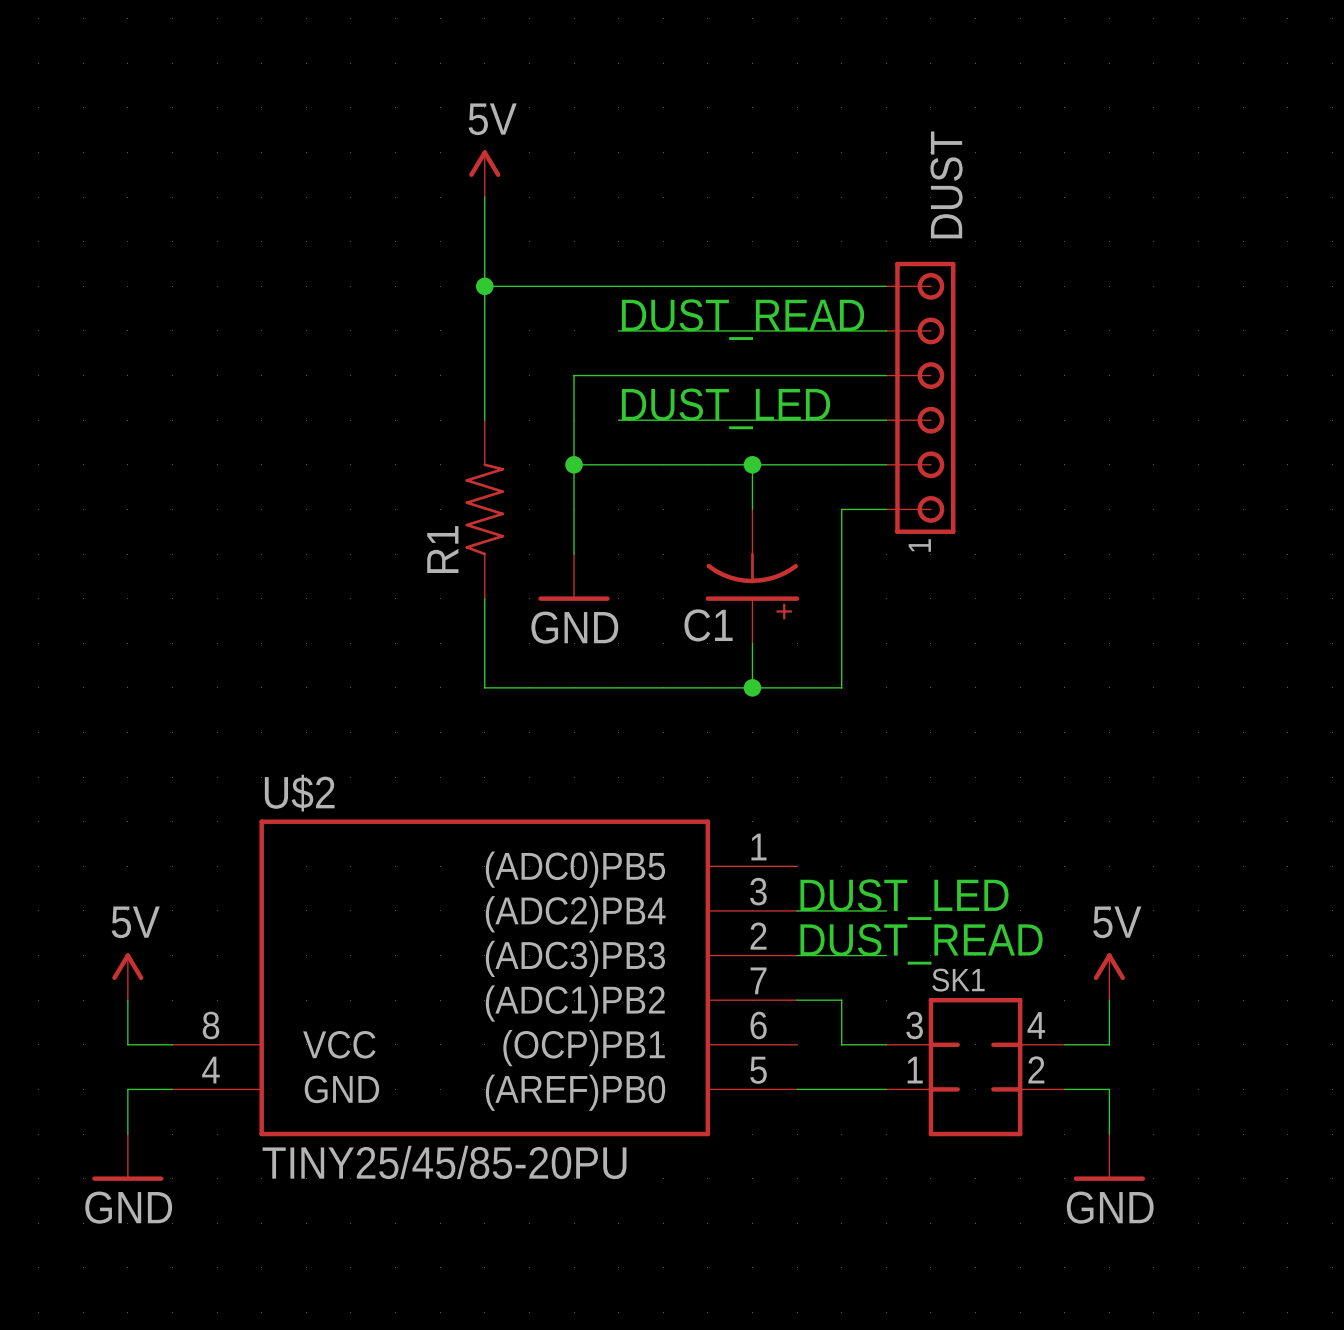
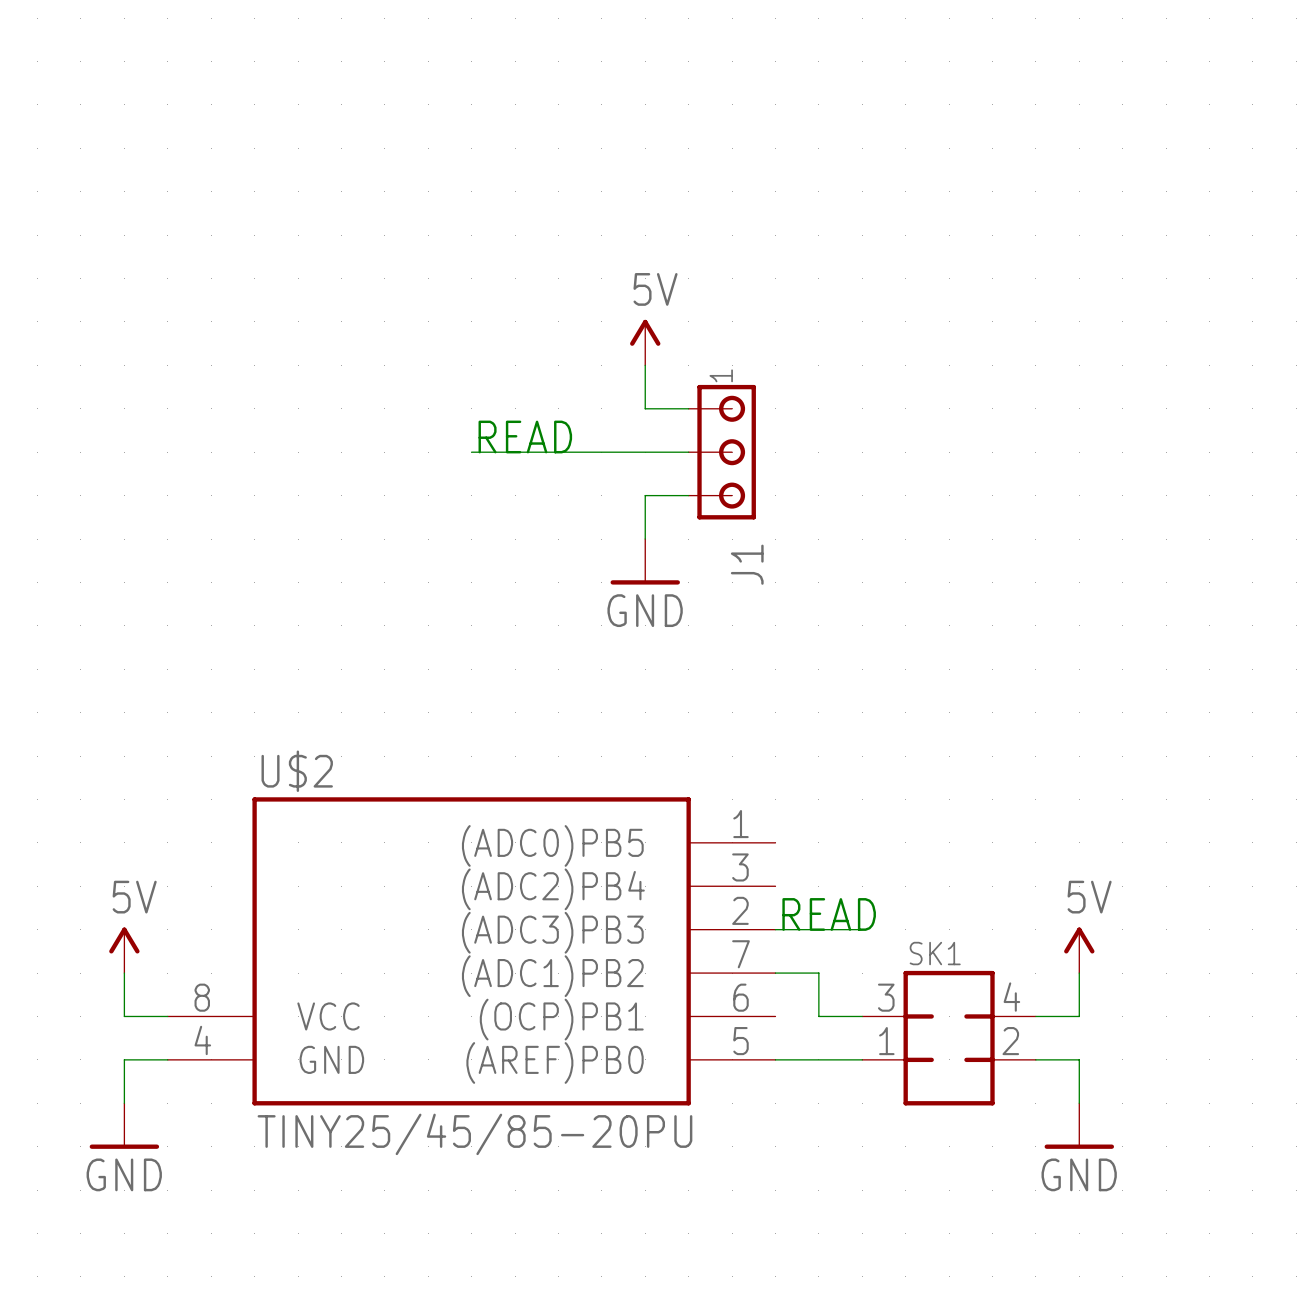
power symbol position: 5V (484, 173) -> 5V (645, 342)
wire: (484, 197) (484, 420) -> none
wire: (484, 286) (886, 286) -> none
junction: (484, 286) -> none
text: DUST_READ (743, 319) -> none
wire: (618, 330) (886, 330) -> none
wire: (886, 375) (574, 375) (574, 554) -> none
DUST: (920, 397) -> none
text: DUST_LED (726, 408) -> none
wire: (618, 420) (663, 420) -> (645, 365) (645, 408)
wire: (707, 420) (886, 420) -> none
text: none -> READ (525, 437)
wire: none -> (471, 452) (558, 452)
junction: (574, 464) -> none
wire: (707, 464) (886, 464) -> none
J1: none -> (722, 452)
wire: (752, 464) (752, 509) -> none
junction: (752, 464) -> none
R1: (484, 509) -> none
wire: none -> (688, 495) (645, 495) (645, 539)
wire: (886, 509) (841, 509) (841, 687) (484, 687) (484, 598) -> none
C1: (752, 576) -> none
power symbol position: GND (574, 577) -> GND (645, 561)
wire: (752, 643) (752, 687) -> none
junction: (752, 687) -> none
text: DUST_LED (904, 899) -> none
wire: (797, 910) (886, 910) -> none
text: DUST_READ (921, 944) -> READ (829, 914)

